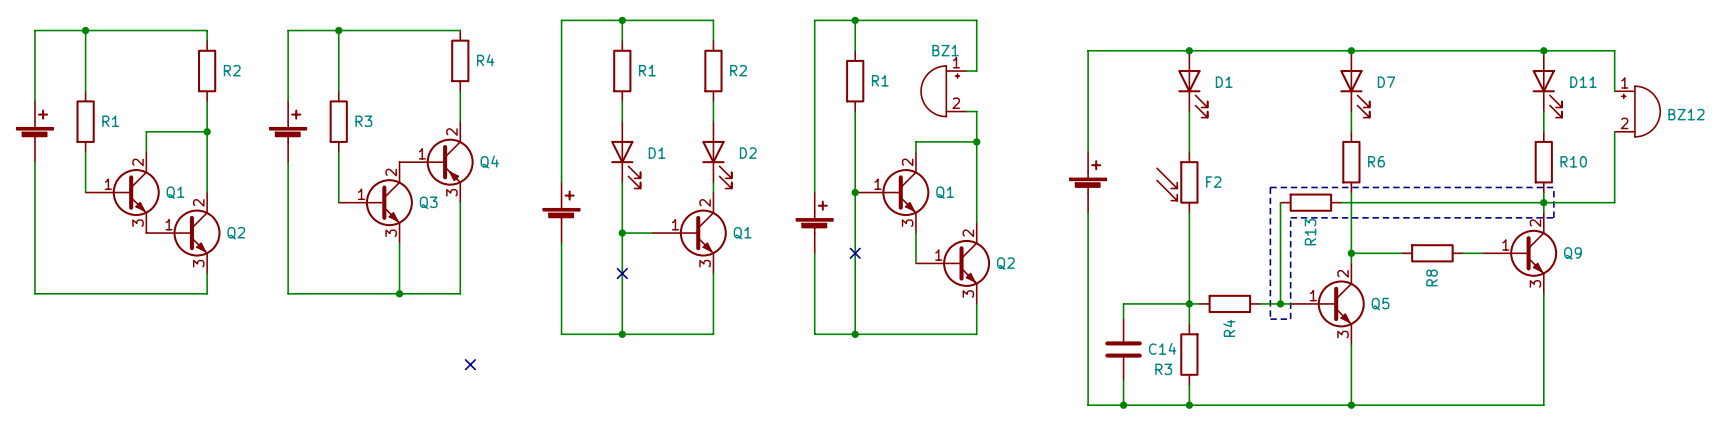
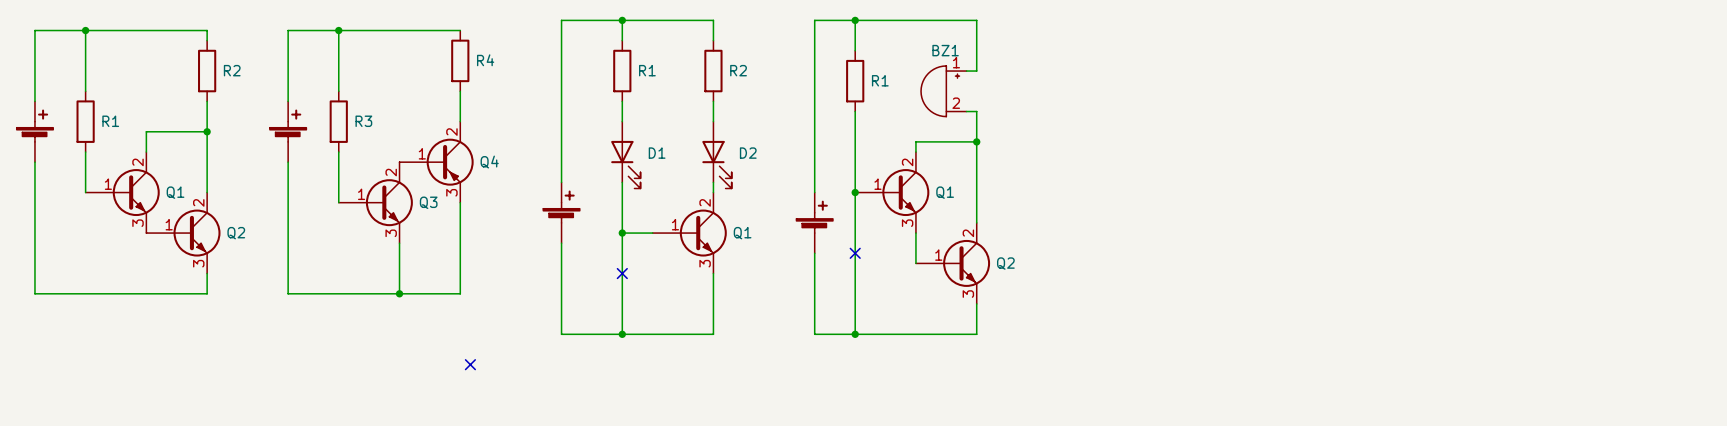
junction: (1189, 50) -> none
junction: (1351, 50) -> none
junction: (1543, 50) -> none
D1: (1192, 84) -> none
D7: (1354, 84) -> none
D11: (1547, 84) -> none
wire: (1614, 91) (1614, 50) (1088, 50) (1088, 152) -> none
wire: (1189, 111) (1189, 152) -> none
wire: (1351, 111) (1351, 131) -> none
wire: (1543, 111) (1543, 131) -> none
BZ12: (1637, 111) -> none
wire: (1614, 131) (1614, 202) (1341, 202) -> none
R6: (1351, 162) -> none
R10: (1543, 162) -> none
part: (1088, 182) -> none
F2: (1177, 182) -> none
line: (1270, 187) (1270, 319) (1290, 319) (1290, 217) (1553, 217) (1553, 187) (1270, 187) -> none
wire: (1351, 192) (1351, 263) -> none
wire: (1543, 192) (1543, 212) -> none
wire: (1280, 202) (1280, 303) -> none
R13: (1310, 202) -> none
junction: (1543, 202) -> none
wire: (1088, 212) (1088, 405) (1543, 405) (1543, 293) -> none
wire: (1189, 212) (1189, 324) -> none
wire: (1351, 253) (1402, 253) -> none
junction: (1351, 253) -> none
R8: (1432, 253) -> none
wire: (1462, 253) (1483, 253) -> none
Q9: (1520, 253) -> none
junction: (1189, 303) -> none
wire: (1199, 303) (1123, 303) (1123, 319) -> none
R4: (1229, 303) -> none
wire: (1260, 303) (1290, 303) -> none
junction: (1280, 303) -> none
Q5: (1327, 303) -> none
wire: (1351, 344) (1351, 405) -> none
C14: (1123, 349) -> none
R3: (1189, 354) -> none
wire: (1123, 379) (1123, 405) -> none
wire: (1189, 384) (1189, 405) -> none
junction: (1123, 405) -> none
junction: (1189, 405) -> none
junction: (1351, 405) -> none

